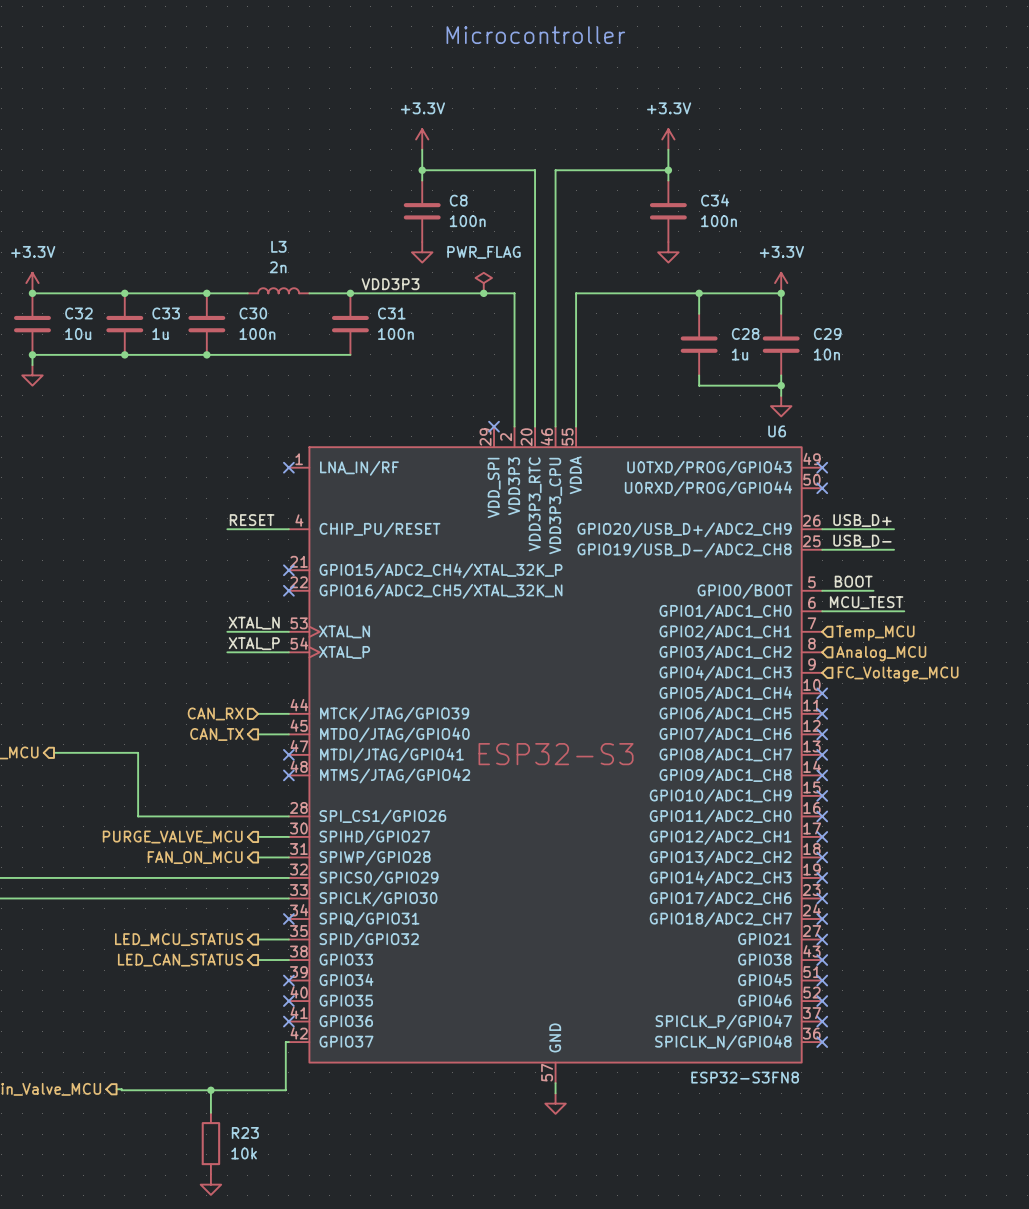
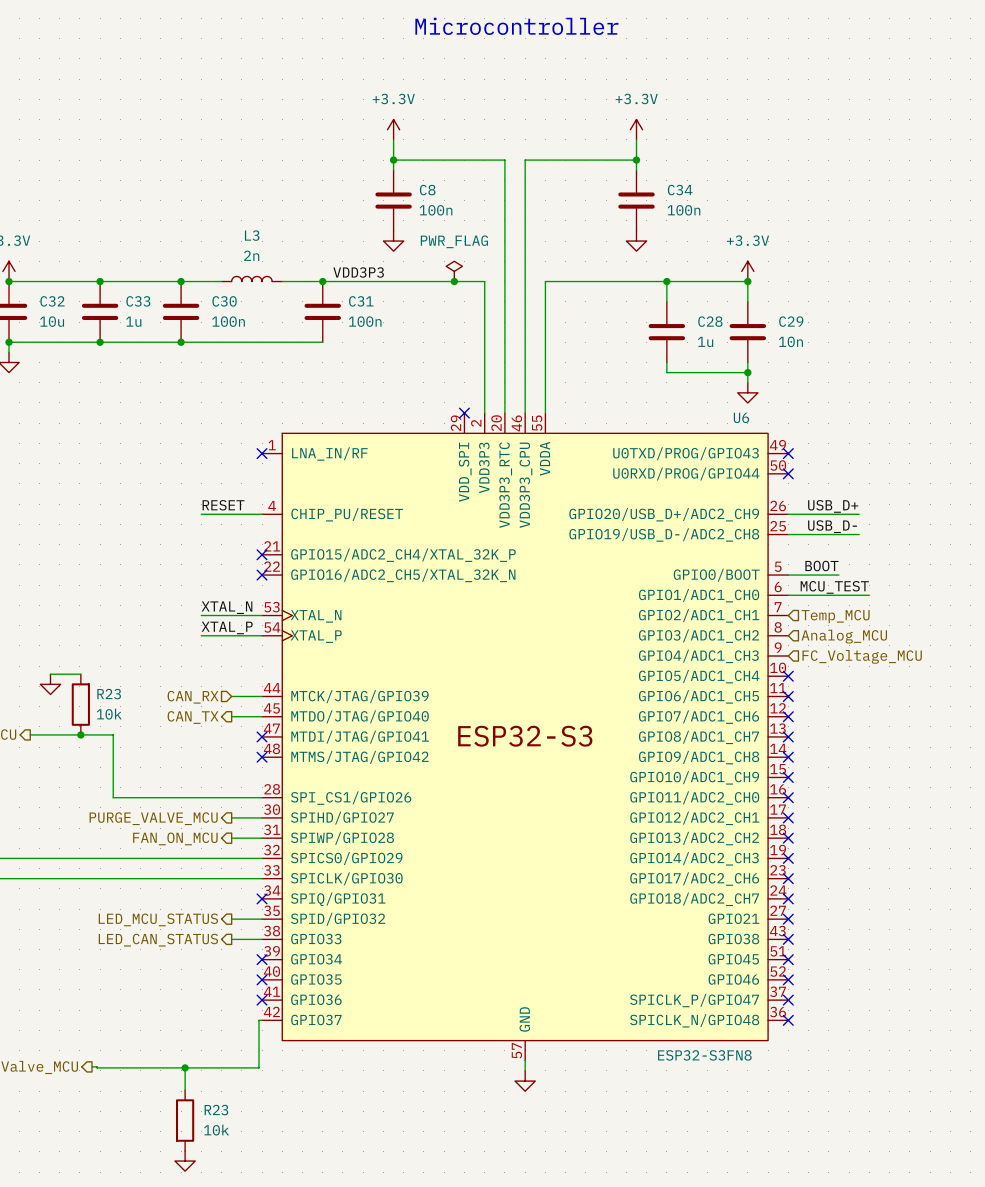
wire: none -> (50, 674) (80, 674)
power symbol: none -> (50, 684)
R23: none -> 10k (80, 704)
junction: none -> (80, 734)

